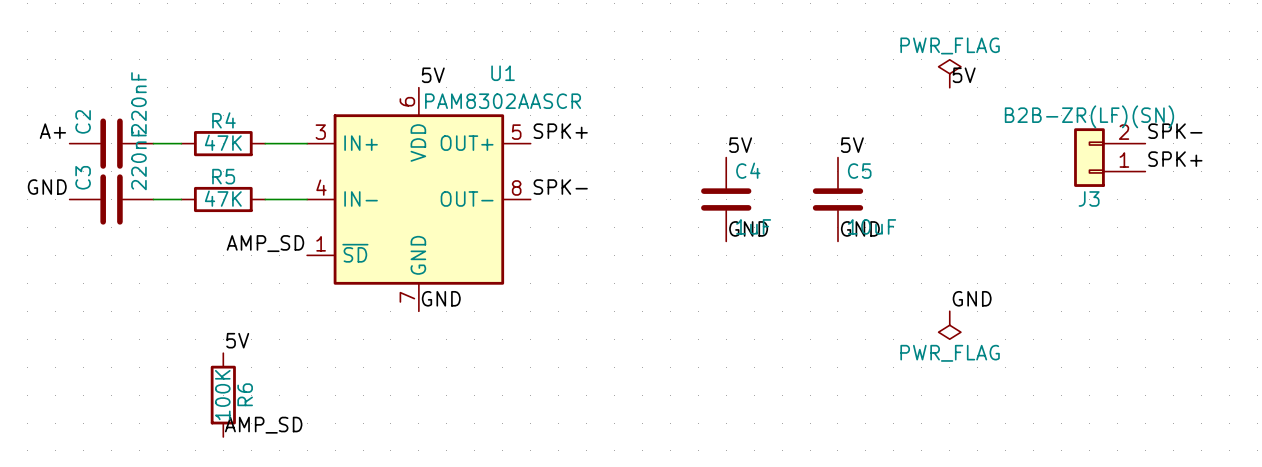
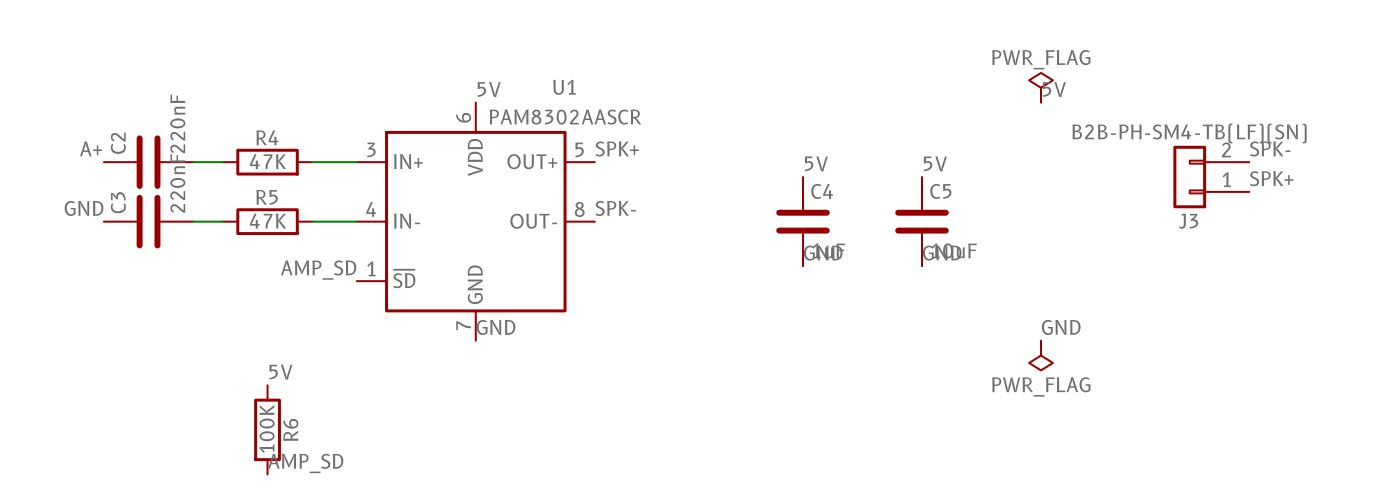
J3 value: B2B-ZR(LF)(SN) (1089, 116) -> B2B-PH-SM4-TB(LF)(SN) (1189, 133)

